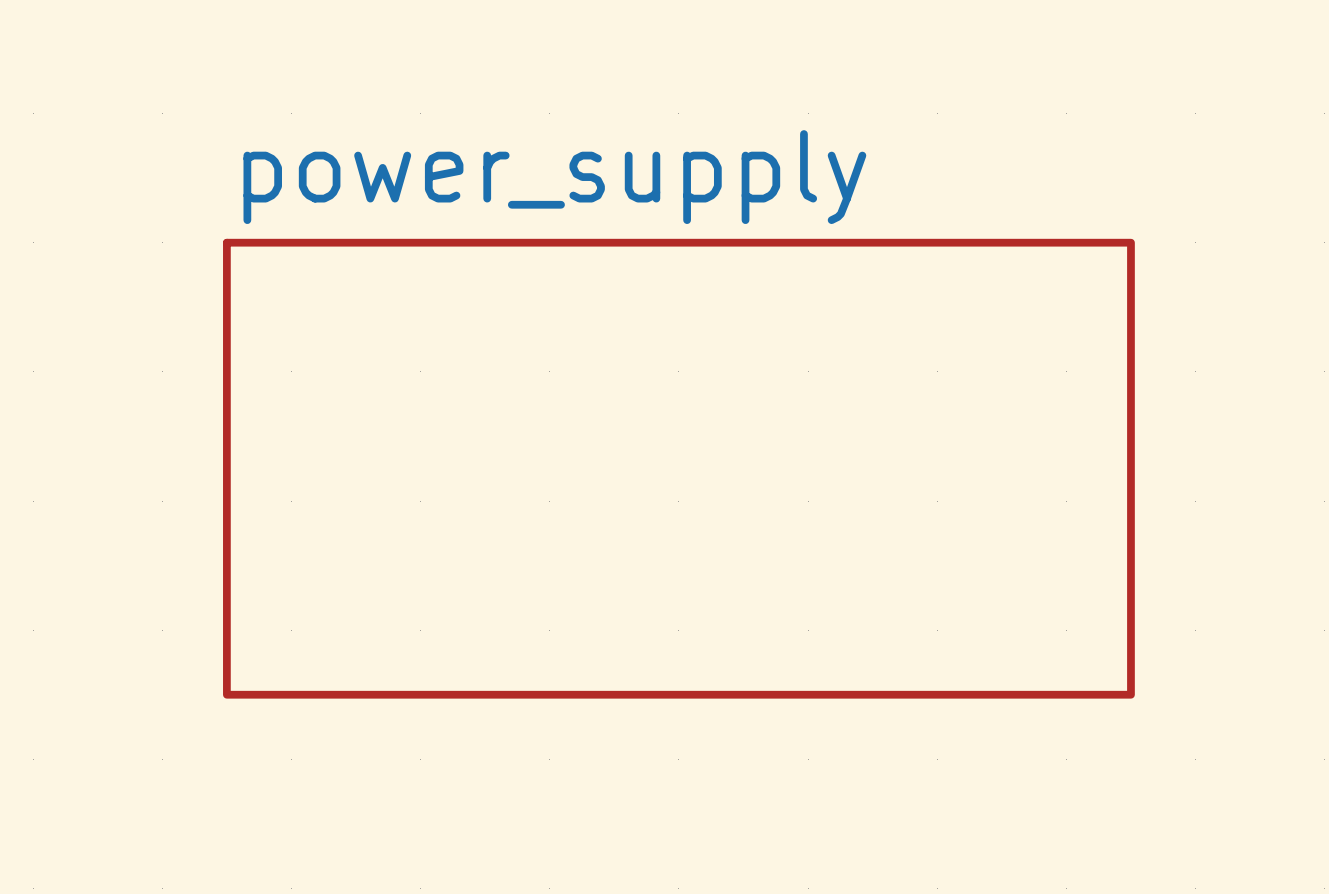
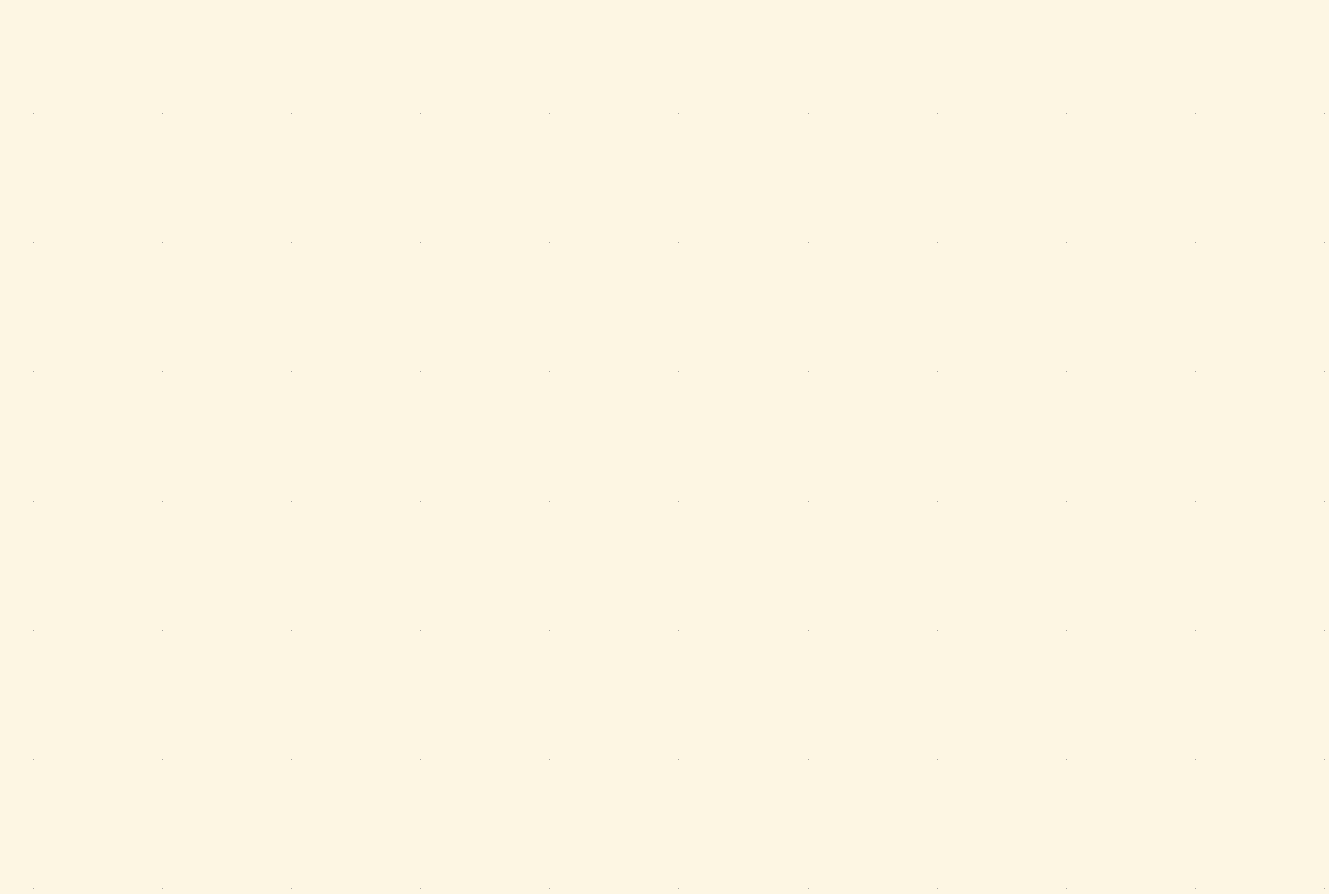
sheet power_supply: (678, 468) -> none

